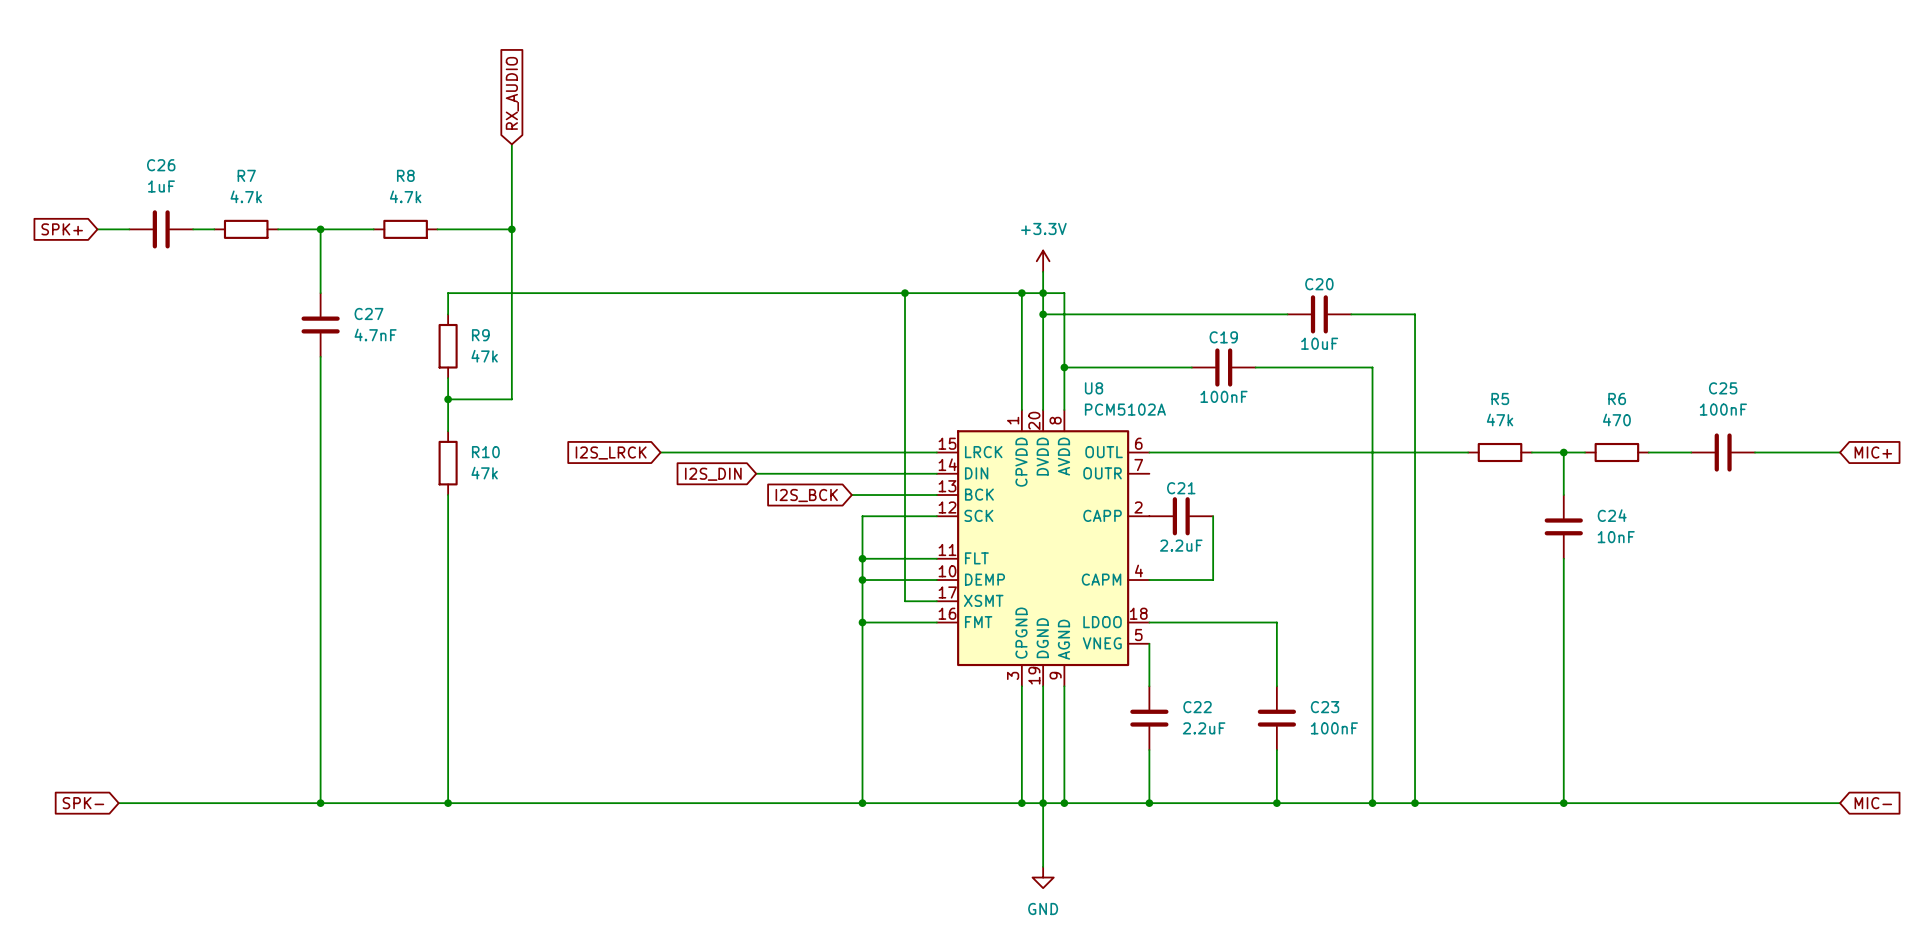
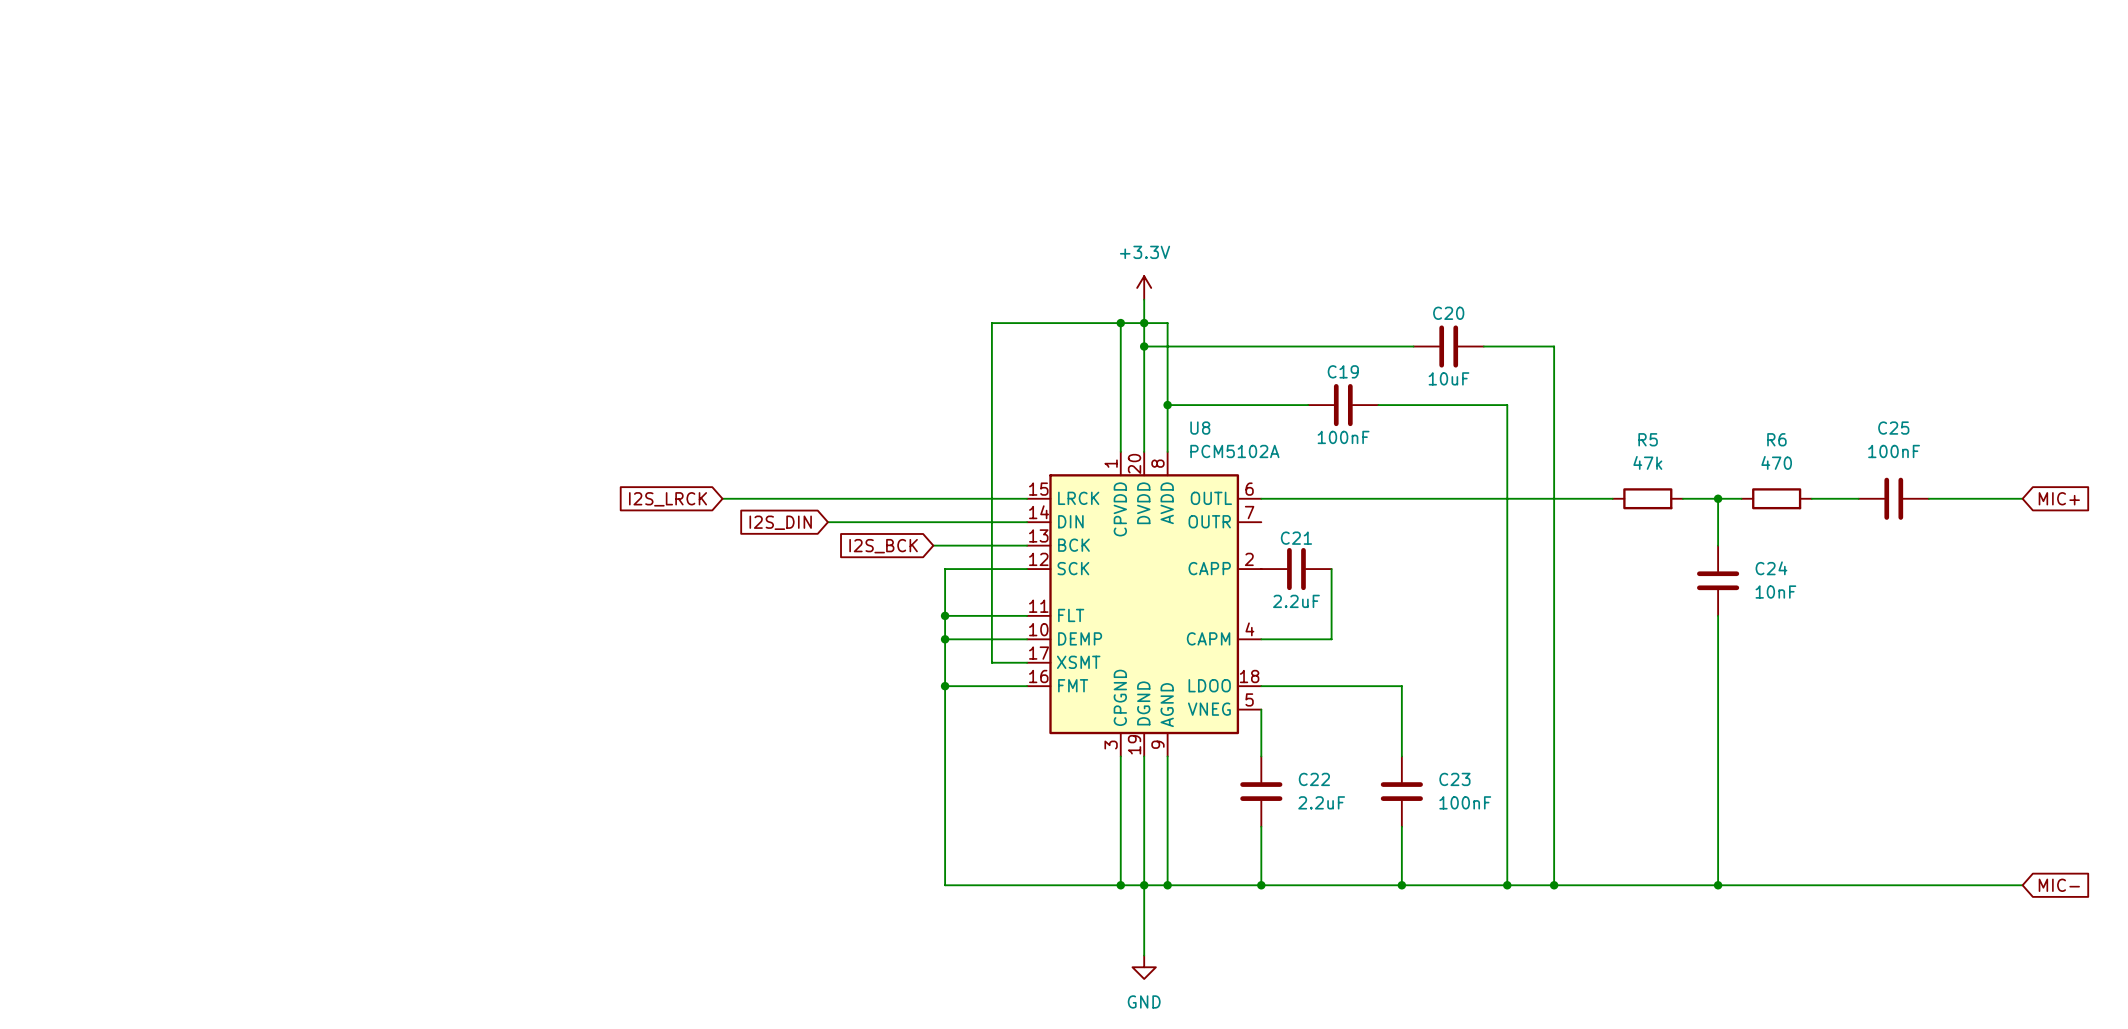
global label: RX_AUDIO (512, 93) -> none
wire: (511, 144) (511, 399) (448, 399) -> none
global label: SPK+ (62, 229) -> none
wire: (97, 229) (129, 229) -> none
C26: 1uF (161, 229) -> none
wire: (193, 229) (214, 229) -> none
R7: 4.7k (246, 229) -> none
wire: (278, 229) (373, 229) -> none
wire: (320, 229) (320, 293) -> none
junction: (320, 229) -> none
R8: 4.7k (405, 229) -> none
wire: (437, 229) (511, 229) -> none
junction: (511, 229) -> none
wire: (905, 293) (448, 293) (448, 314) -> none
junction: (905, 293) -> none
C27: 4.7nF (320, 325) -> none
R9: 47k (448, 346) -> none
wire: (320, 356) (320, 803) -> none
wire: (448, 378) (448, 431) -> none
junction: (448, 399) -> none
R10: 47k (448, 463) -> none
wire: (448, 495) (448, 803) -> none
global label: SPK- (83, 803) -> none
wire: (118, 803) (862, 803) -> none
junction: (320, 803) -> none
junction: (448, 803) -> none
junction: (862, 803) -> none

